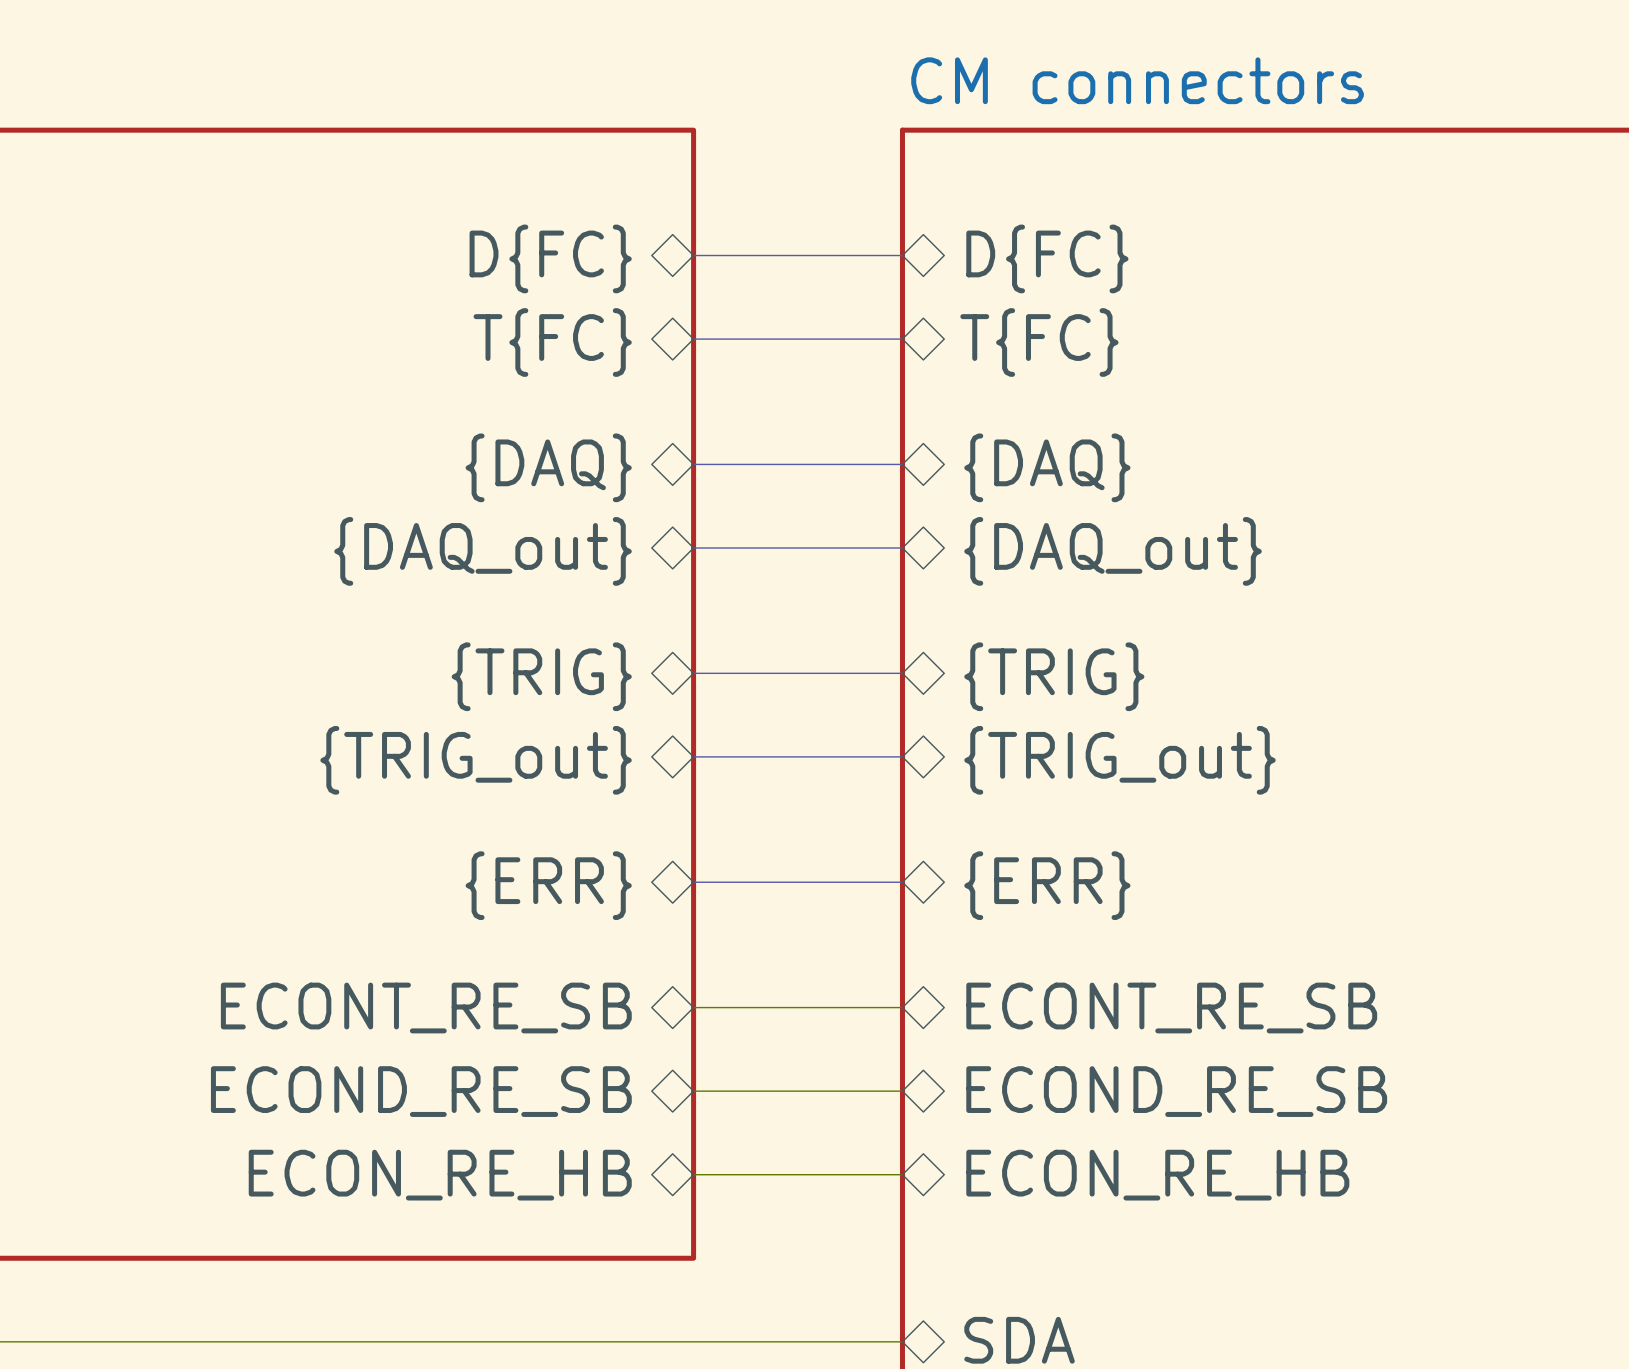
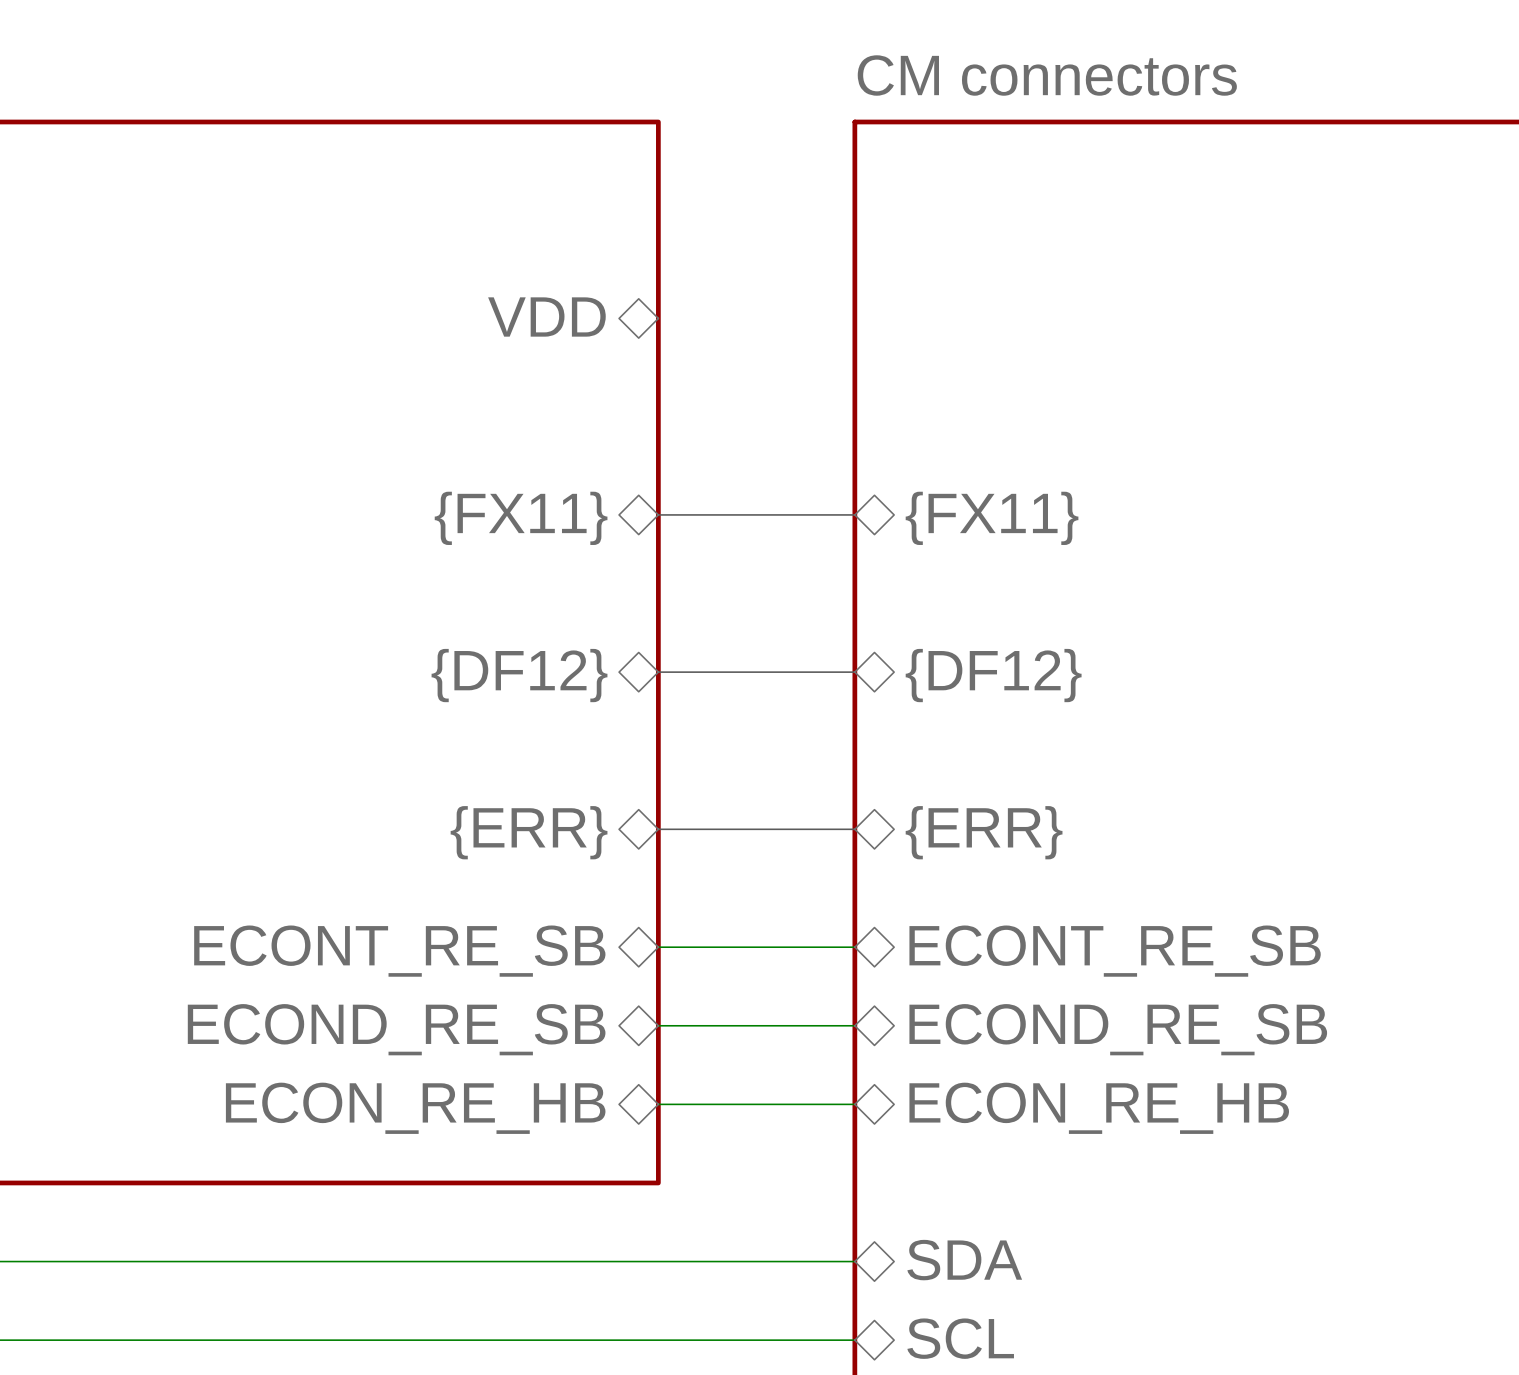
bus: (693, 255) (902, 255) -> none
sheet pin: D{FC} (550, 258) -> none
sheet pin: D{FC} (1047, 258) -> none
bus: (693, 339) (902, 339) -> none
sheet pin: T{FC} (552, 342) -> VDD (546, 317)
sheet pin: T{FC} (1039, 342) -> none
bus: (693, 464) (902, 464) -> none
sheet pin: {DAQ} (548, 467) -> none
sheet pin: {DAQ} (1047, 467) -> none
sheet pin: {DAQ_out} (483, 551) -> {FX11} (521, 518)
sheet pin: {DAQ_out} (1113, 551) -> {FX11} (992, 518)
bus: (693, 673) (902, 673) -> (658, 672) (854, 672)
sheet pin: {TRIG} (541, 676) -> none
sheet pin: {TRIG} (1054, 676) -> none
sheet pin: none -> {DF12} (519, 675)
sheet pin: none -> {DF12} (993, 675)
bus: (693, 756) (902, 756) -> none
sheet pin: {TRIG_out} (476, 760) -> none
sheet pin: {TRIG_out} (1119, 760) -> none

